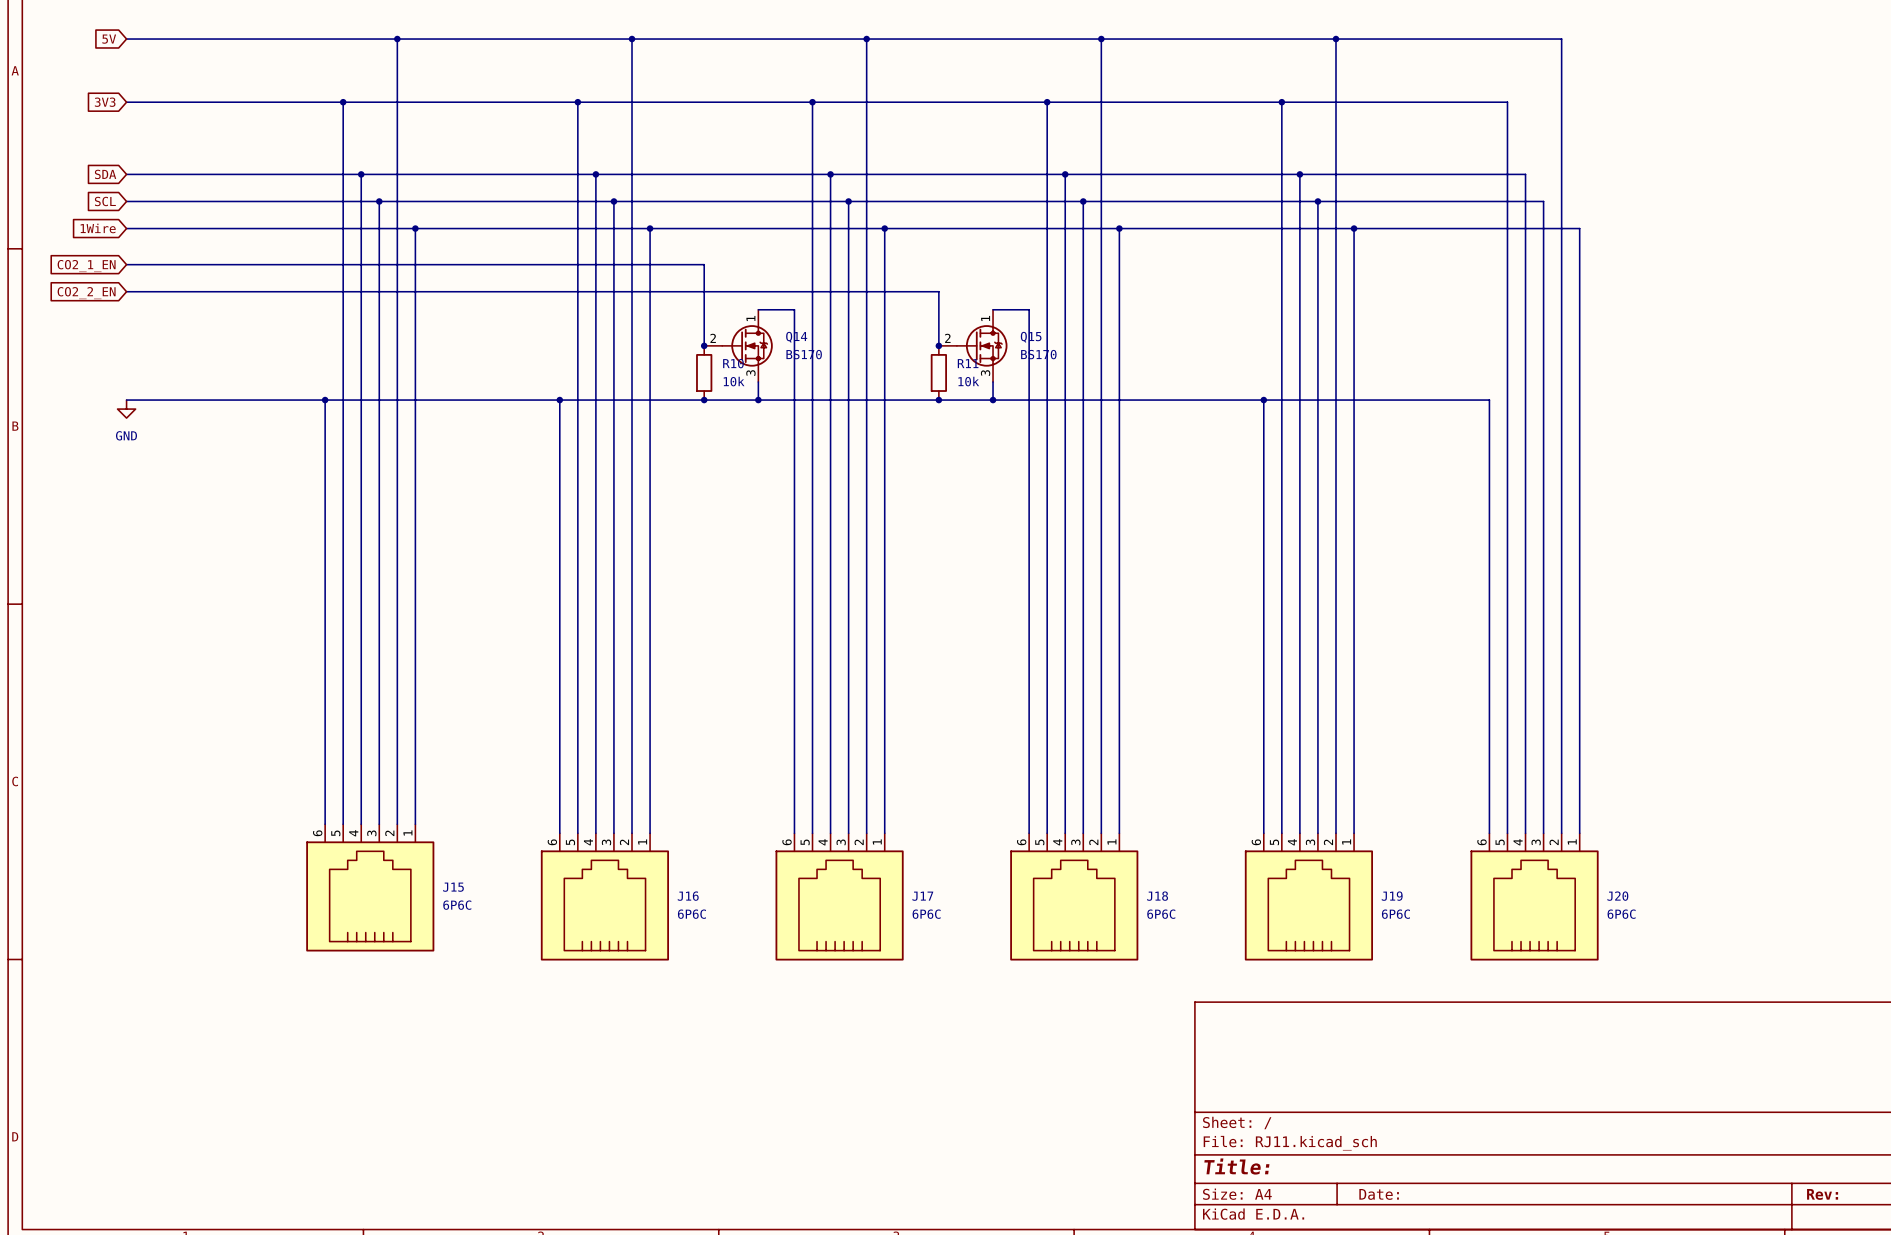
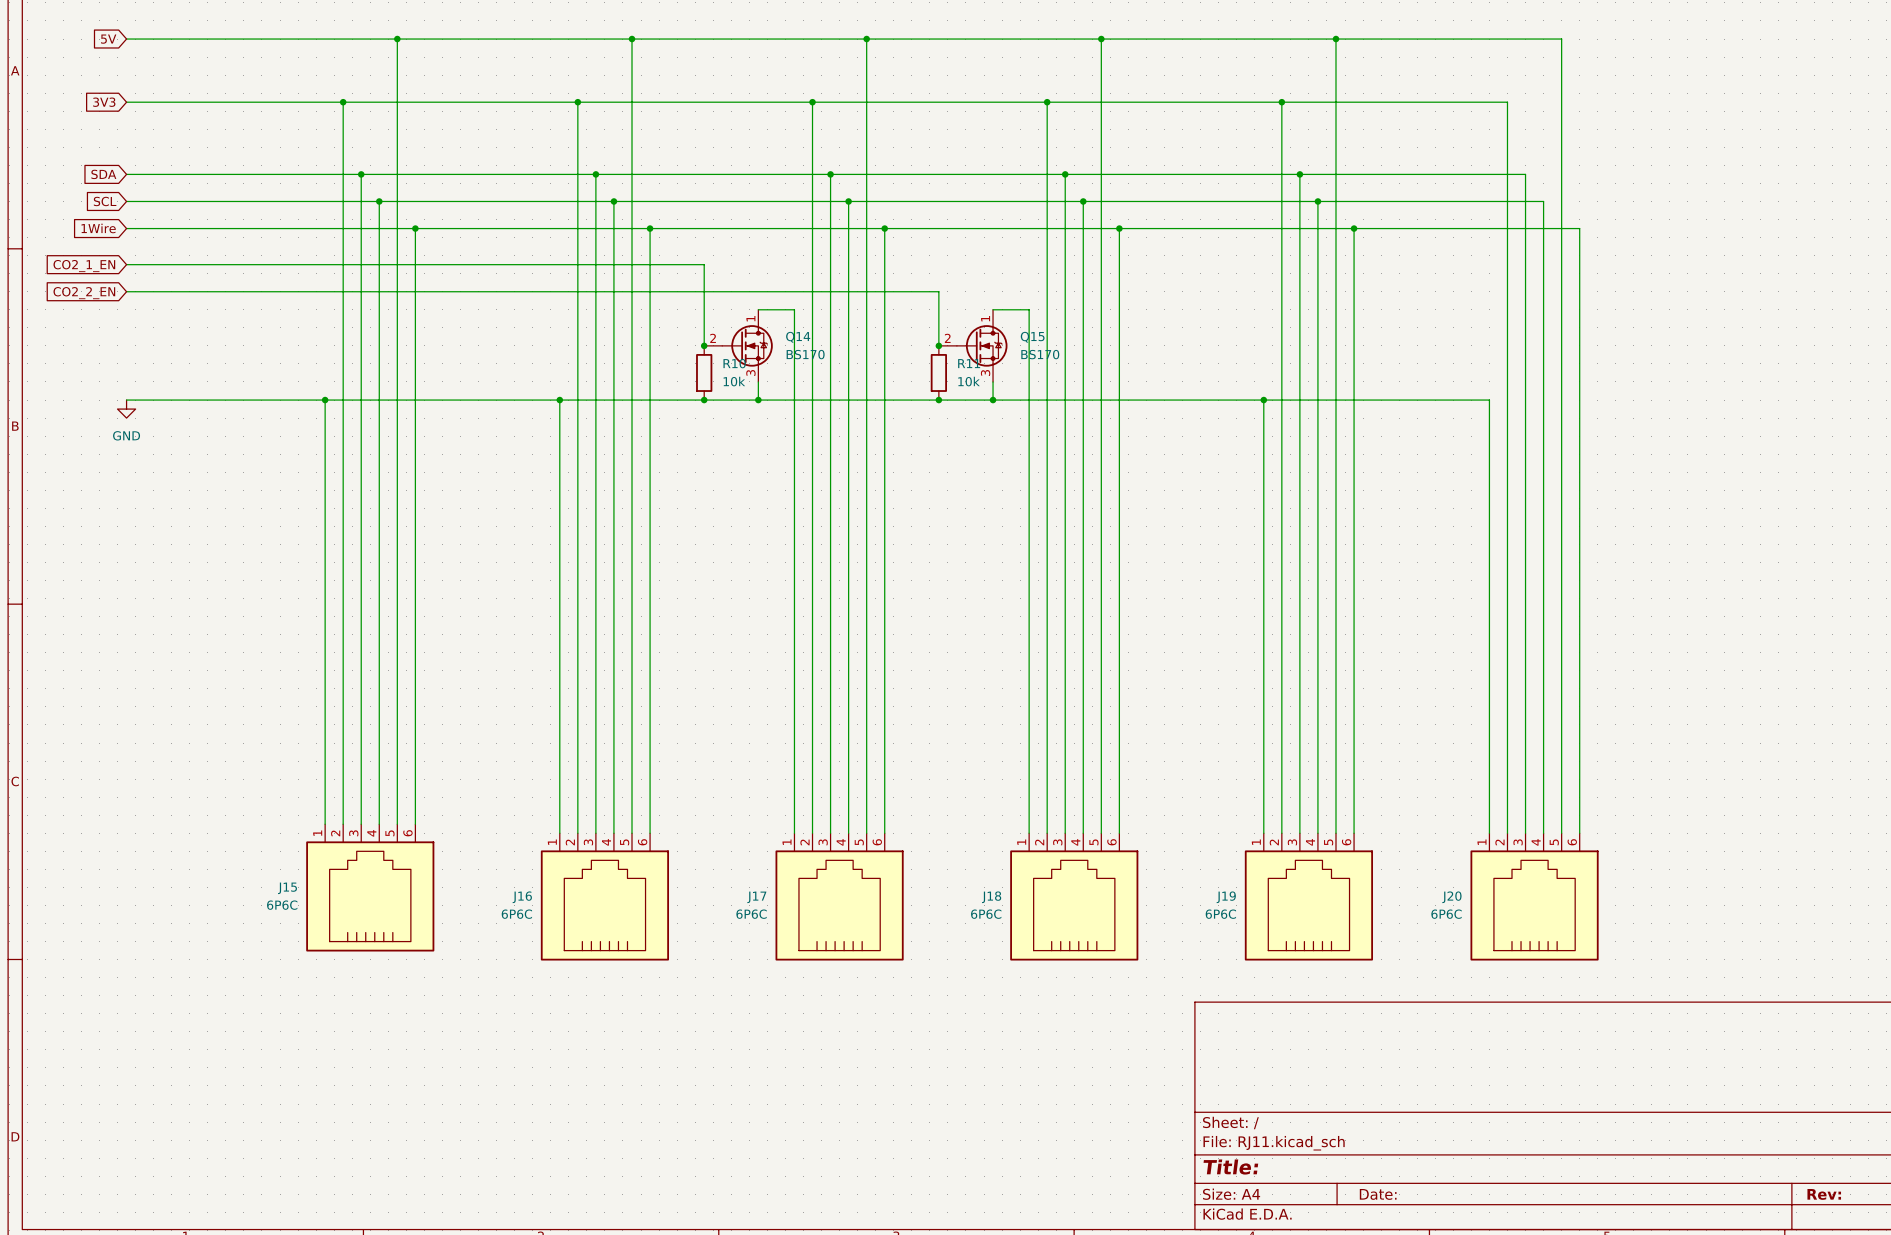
J15 flip: as is (370, 896) -> left-right (370, 896)
J16 flip: as is (604, 905) -> left-right (604, 905)
J17 flip: as is (839, 905) -> left-right (839, 905)
J18 flip: as is (1074, 905) -> left-right (1074, 905)
J19 flip: as is (1308, 905) -> left-right (1308, 905)
J20 flip: as is (1534, 905) -> left-right (1534, 905)

